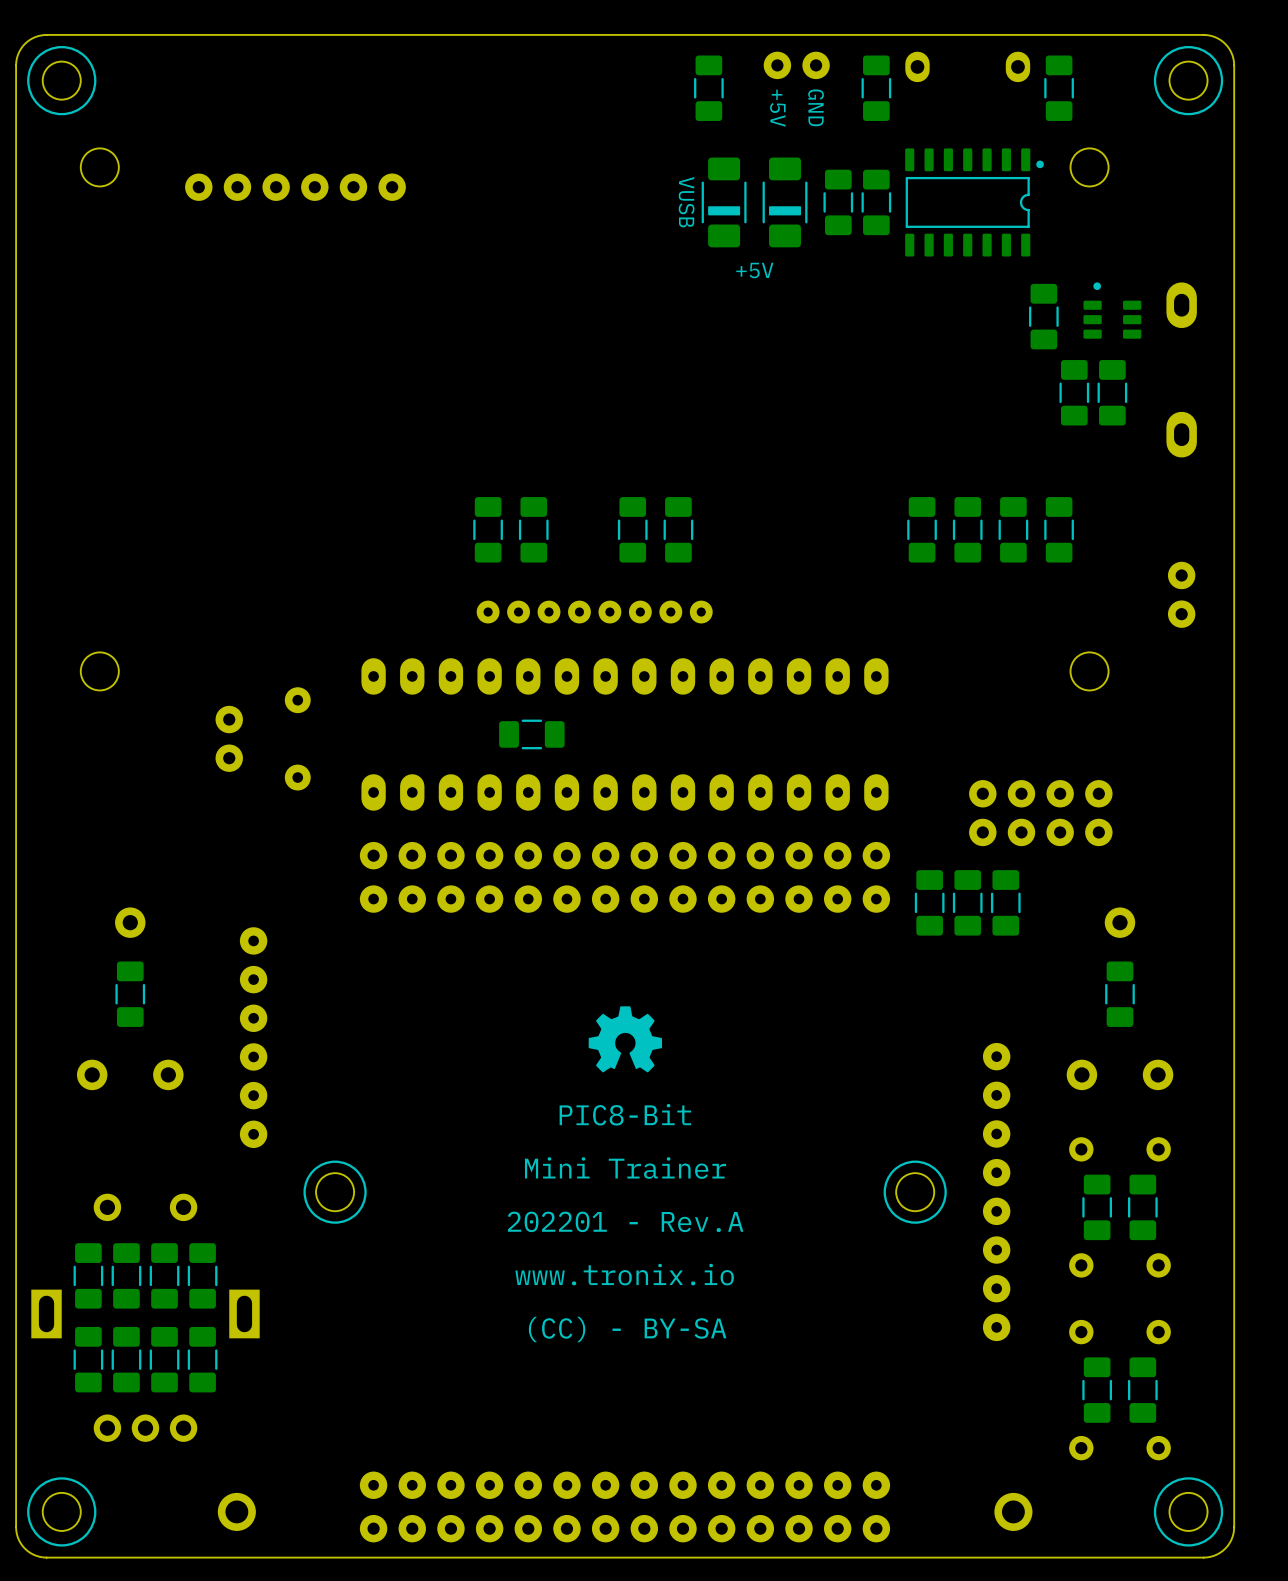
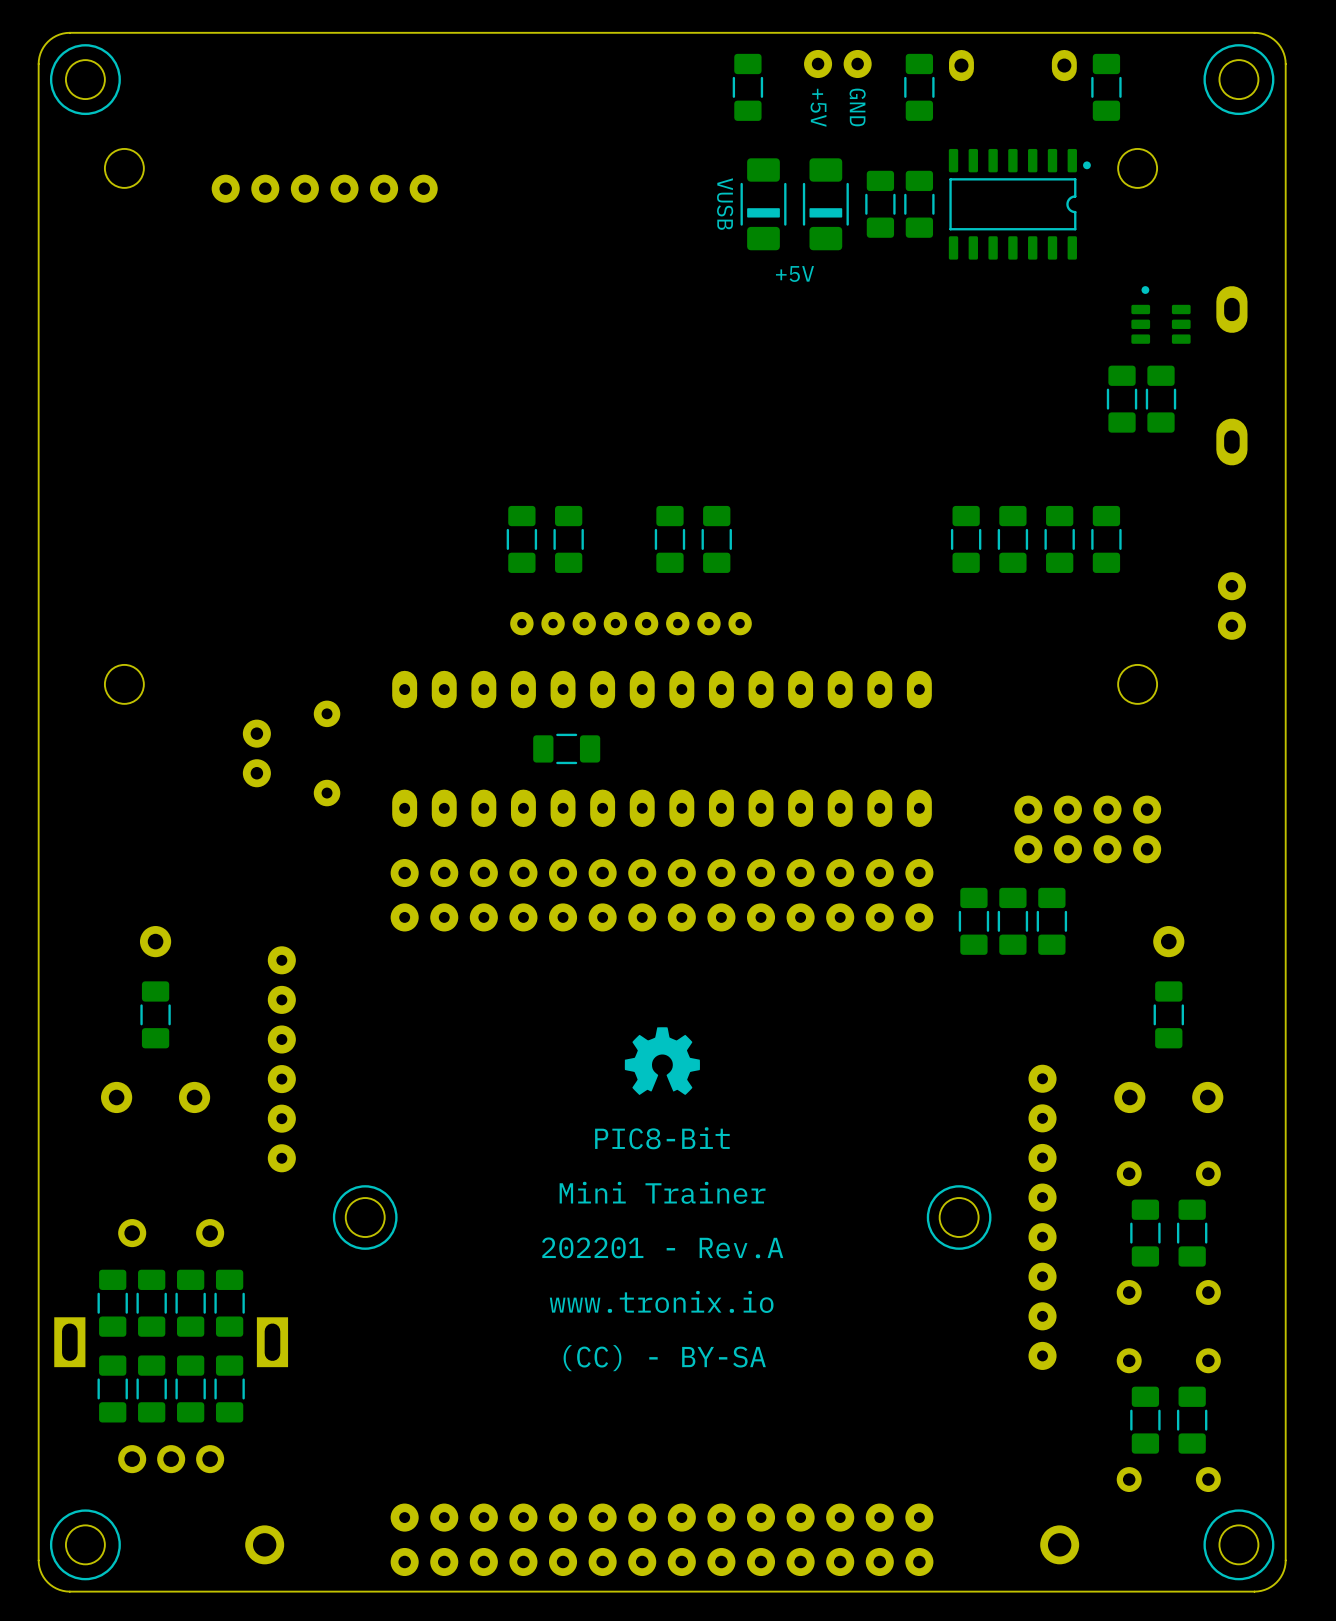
part: (1043, 316) -> none

